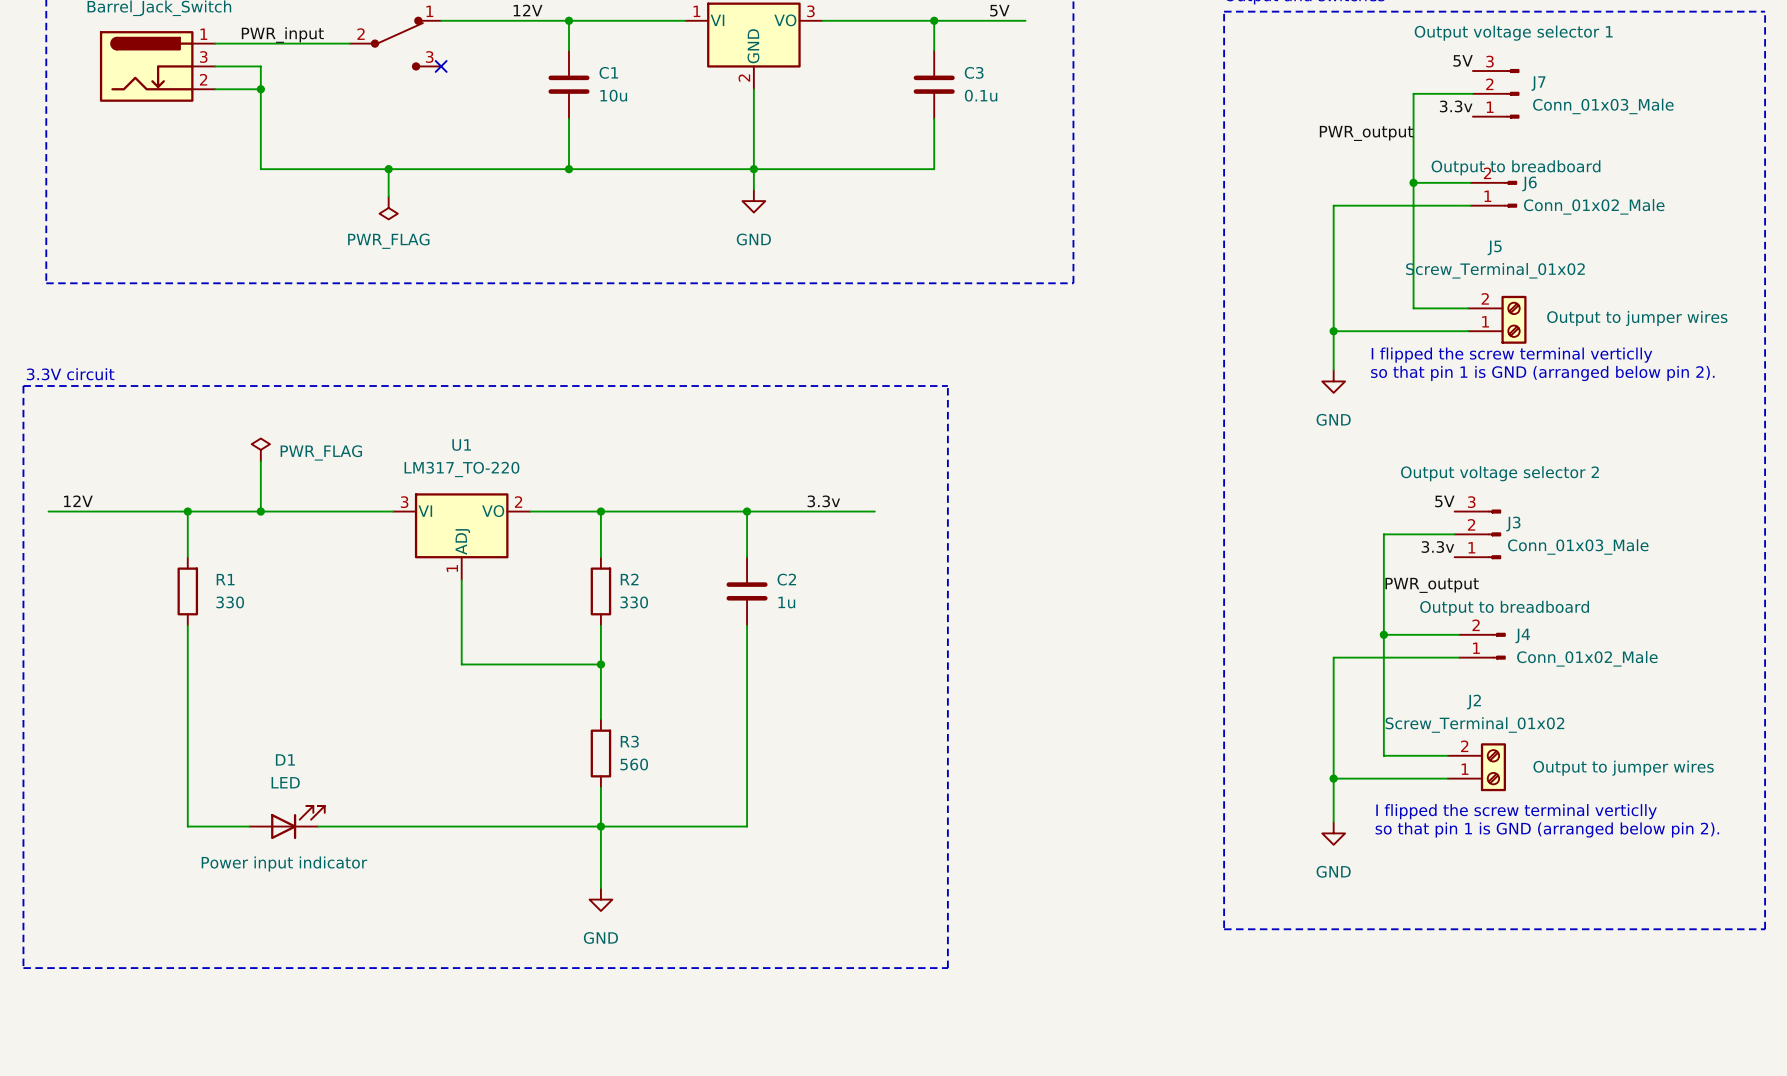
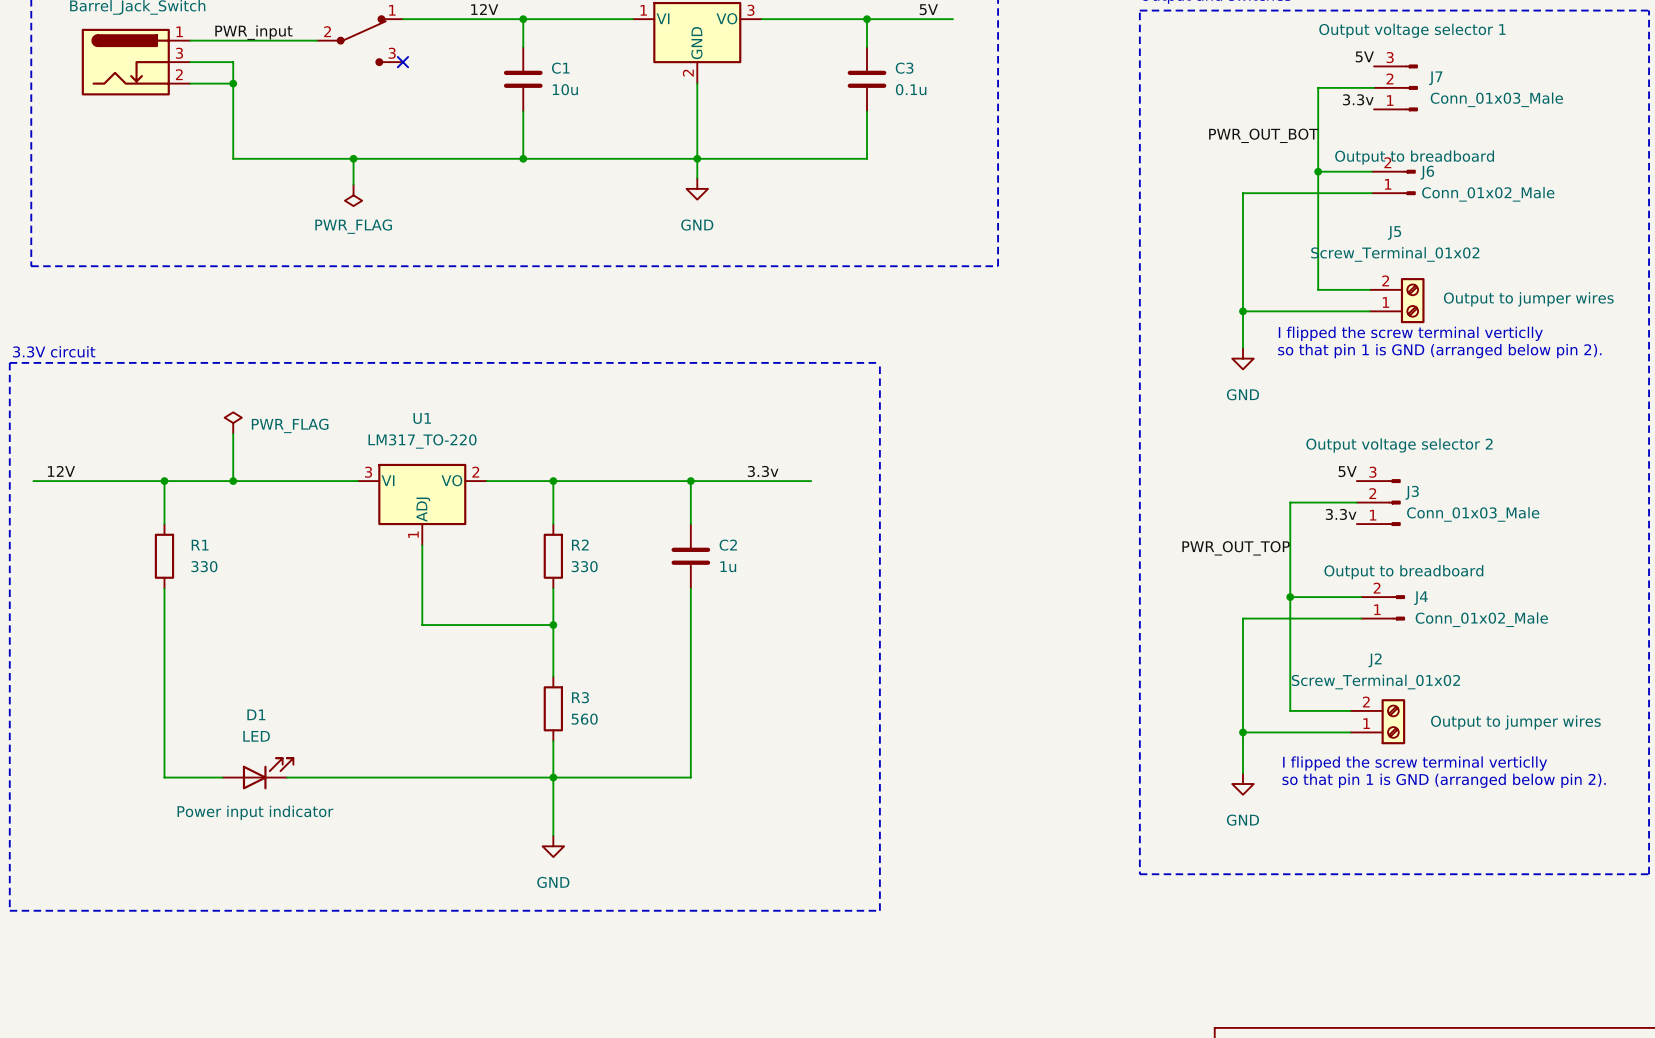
label: PWR_output (1366, 133) -> none
label: none -> PWR_OUT_BOT (1263, 135)
label: PWR_output (1432, 585) -> PWR_OUT_TOP (1236, 548)

